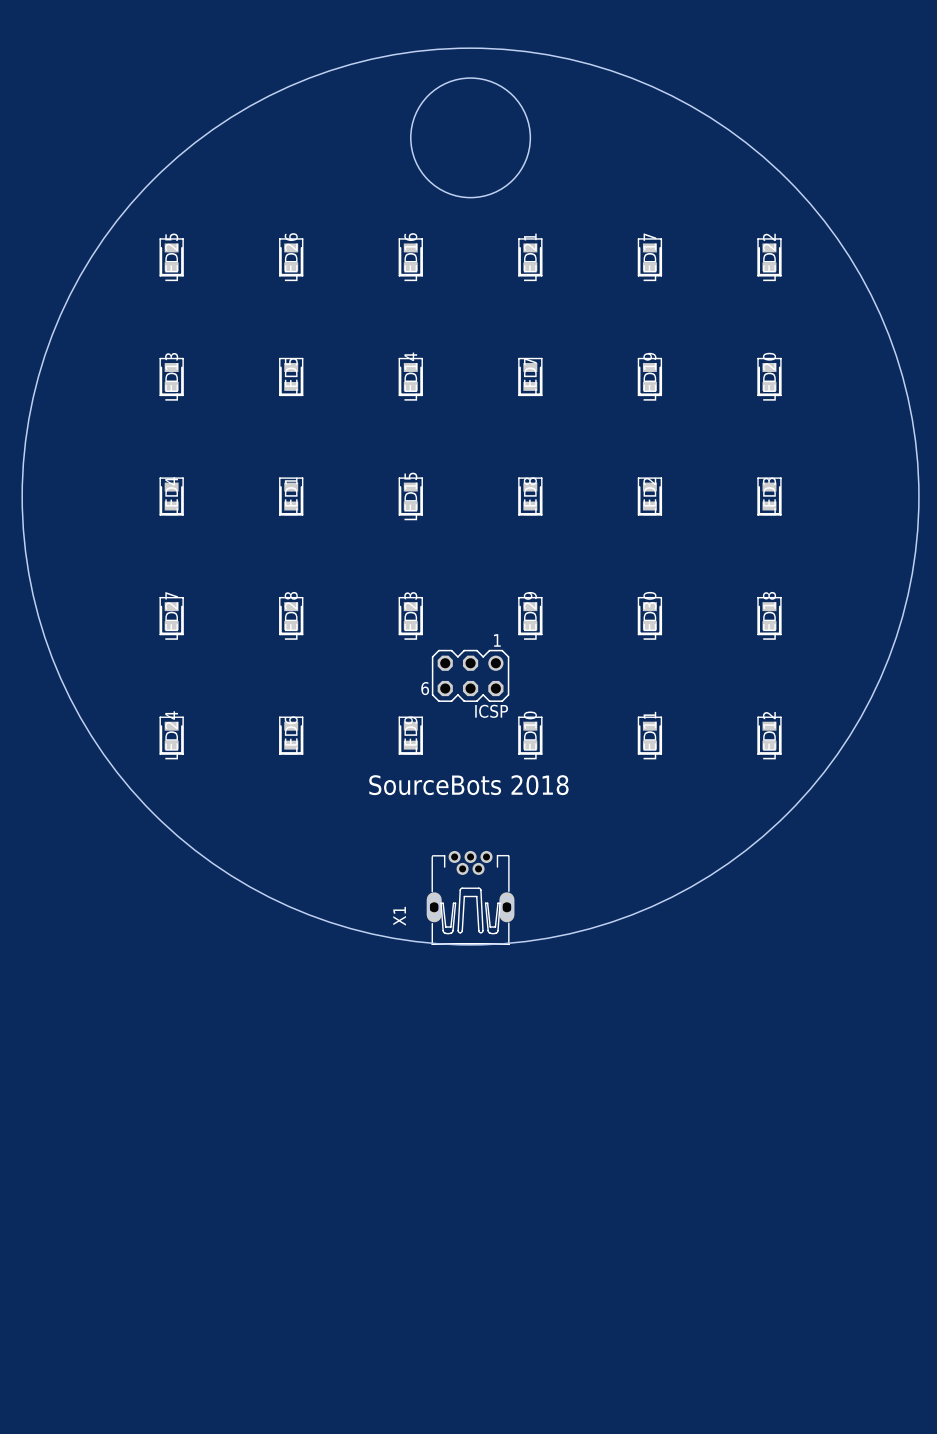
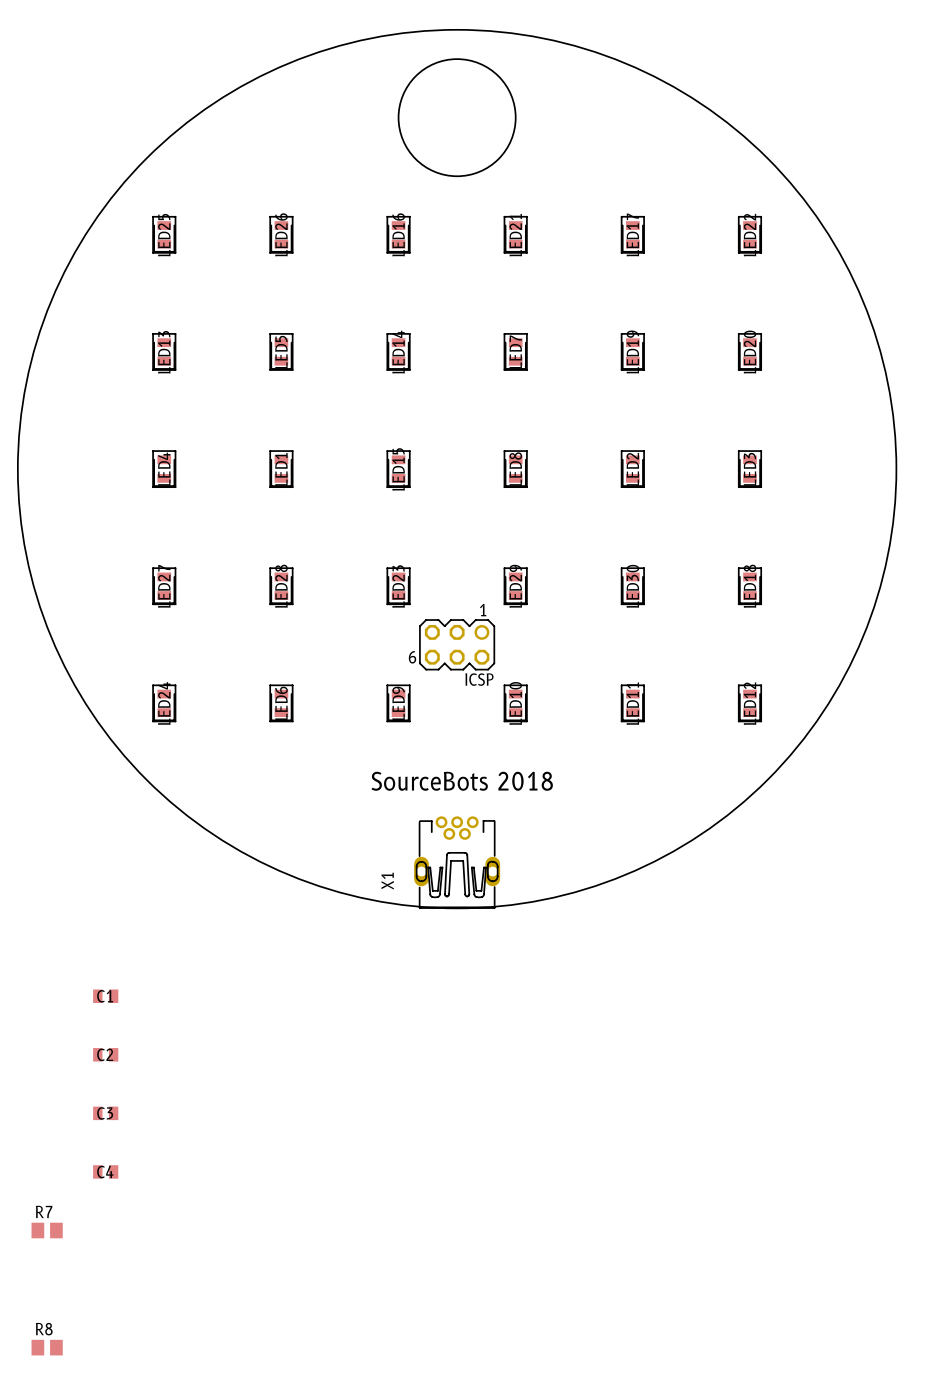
text position: SourceBots 2018 (468, 785) -> SourceBots 2018 (462, 781)
C1: none -> (105, 996)
C2: none -> (105, 1054)
C3: none -> (105, 1113)
C4: none -> (105, 1171)
R7: none -> (47, 1230)
R8: none -> (47, 1347)

